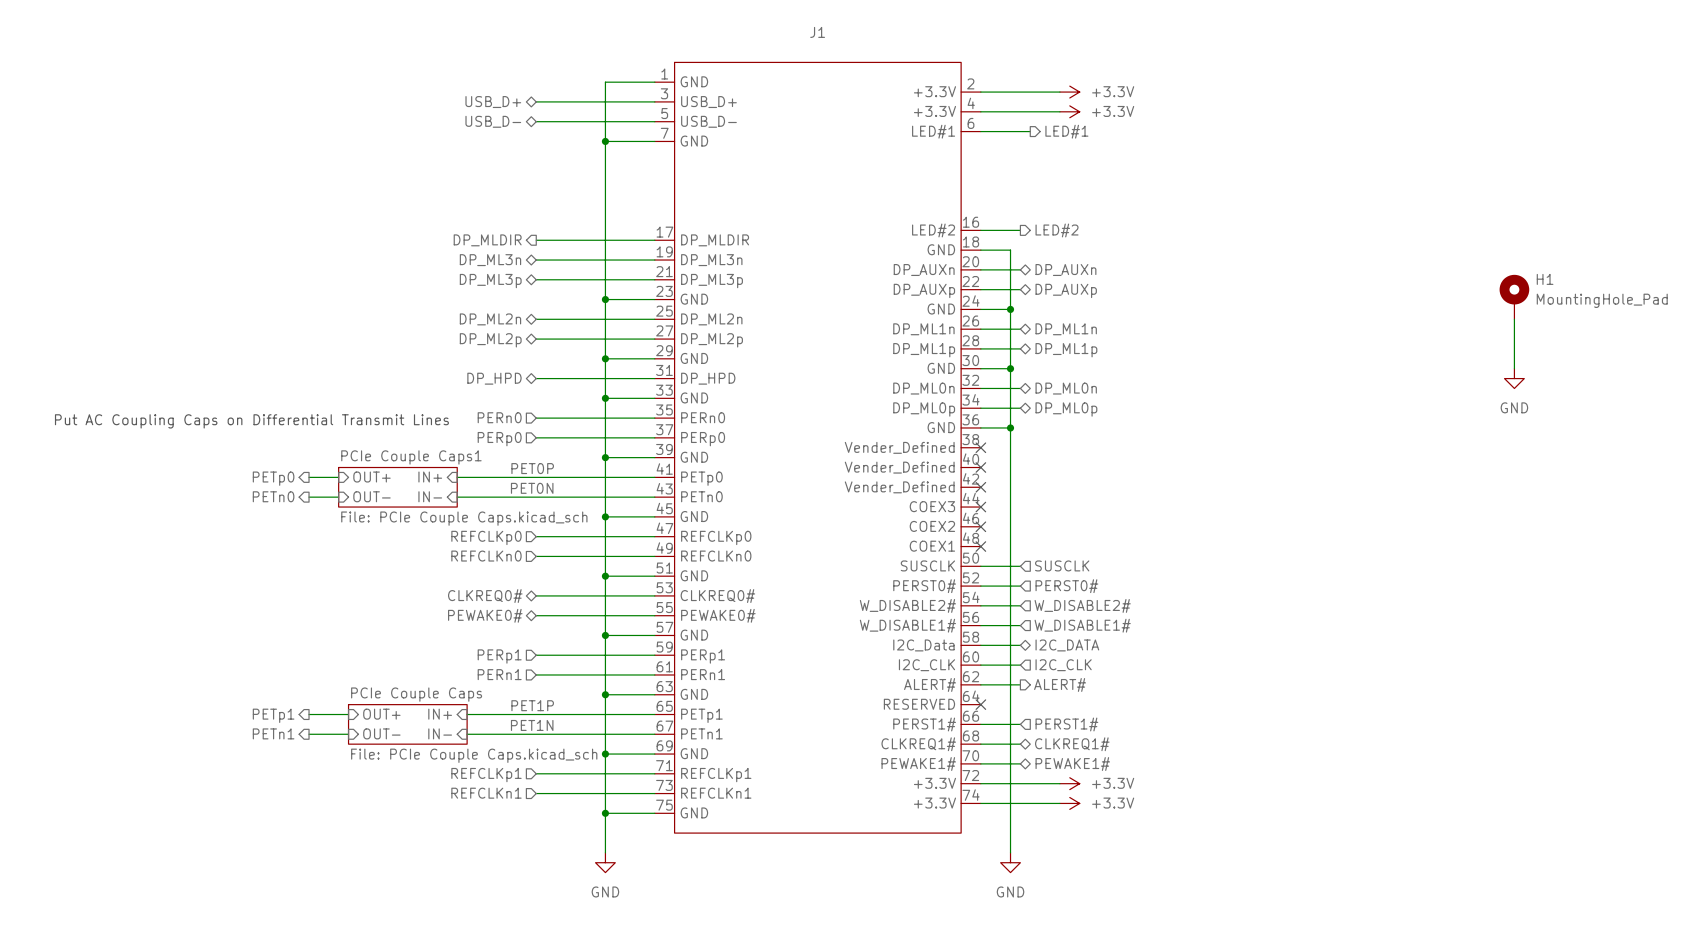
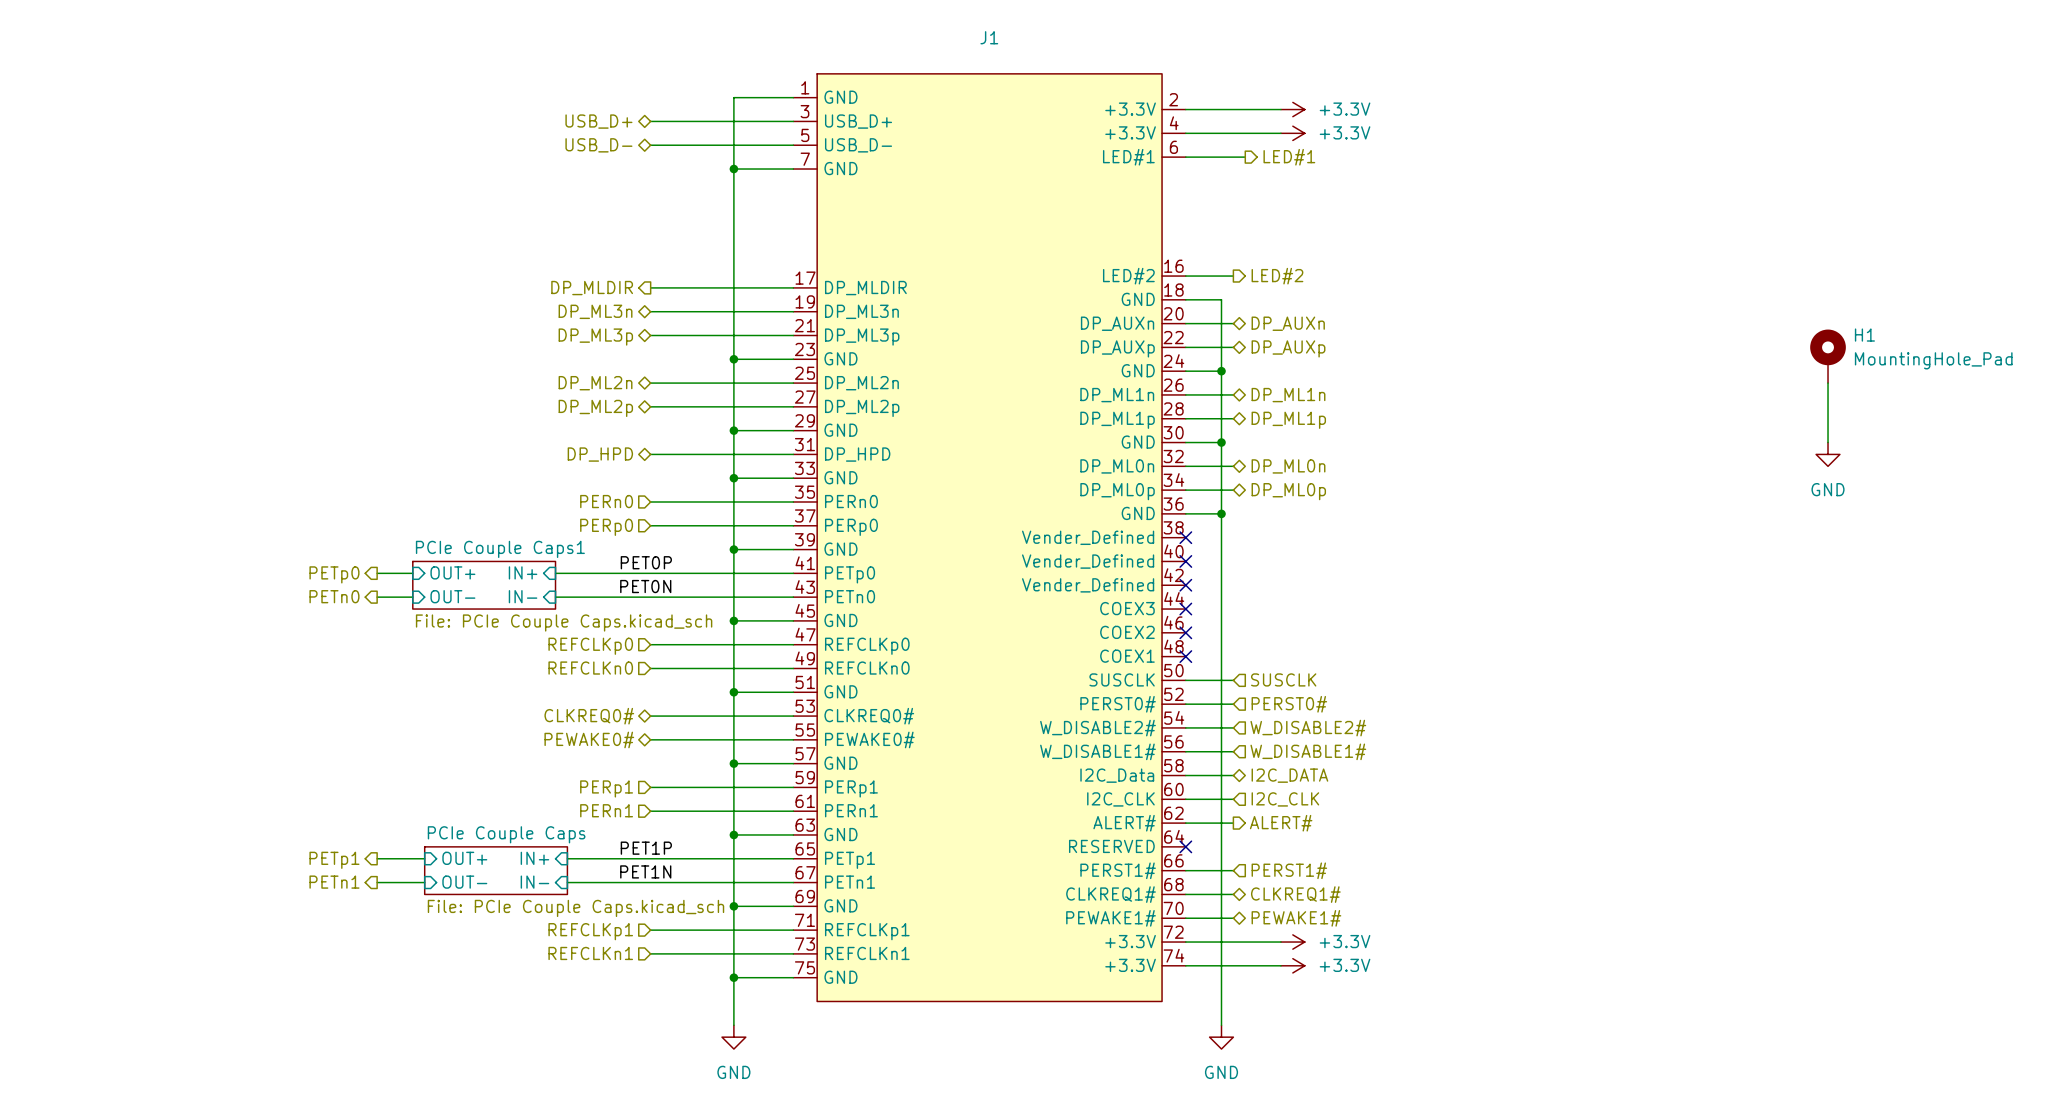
text: Put AC Coupling Caps on Differential Transmit Lines (251, 421) -> none

